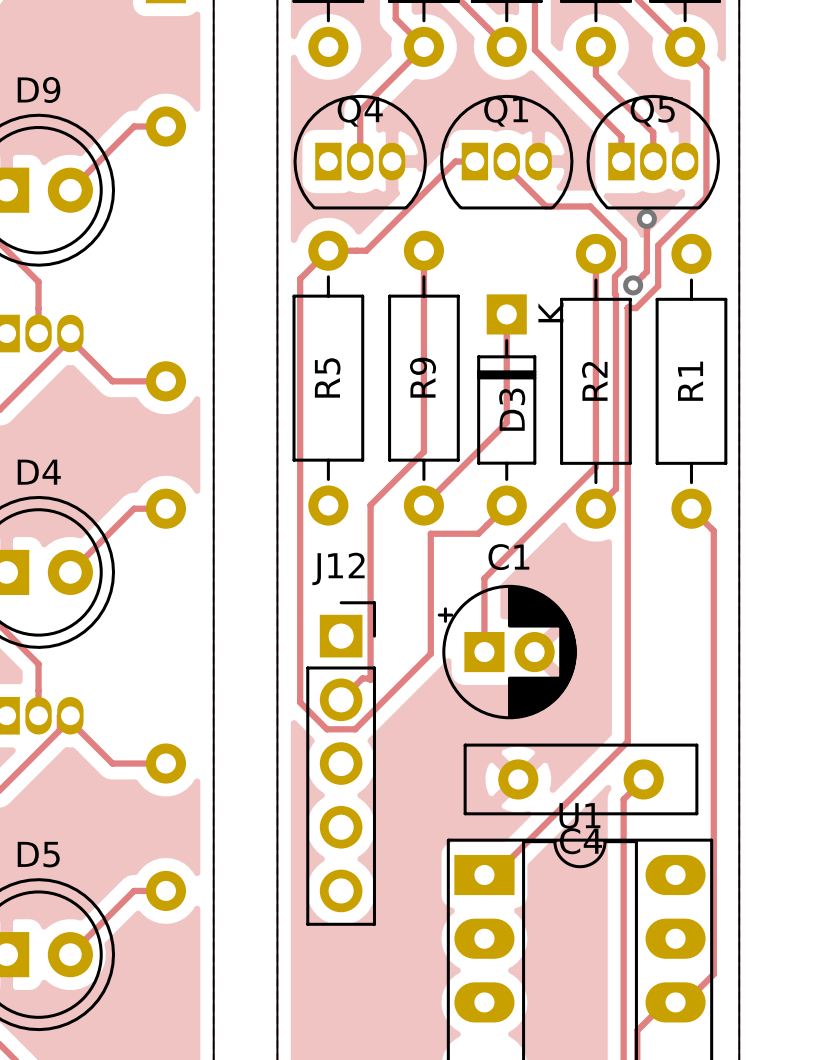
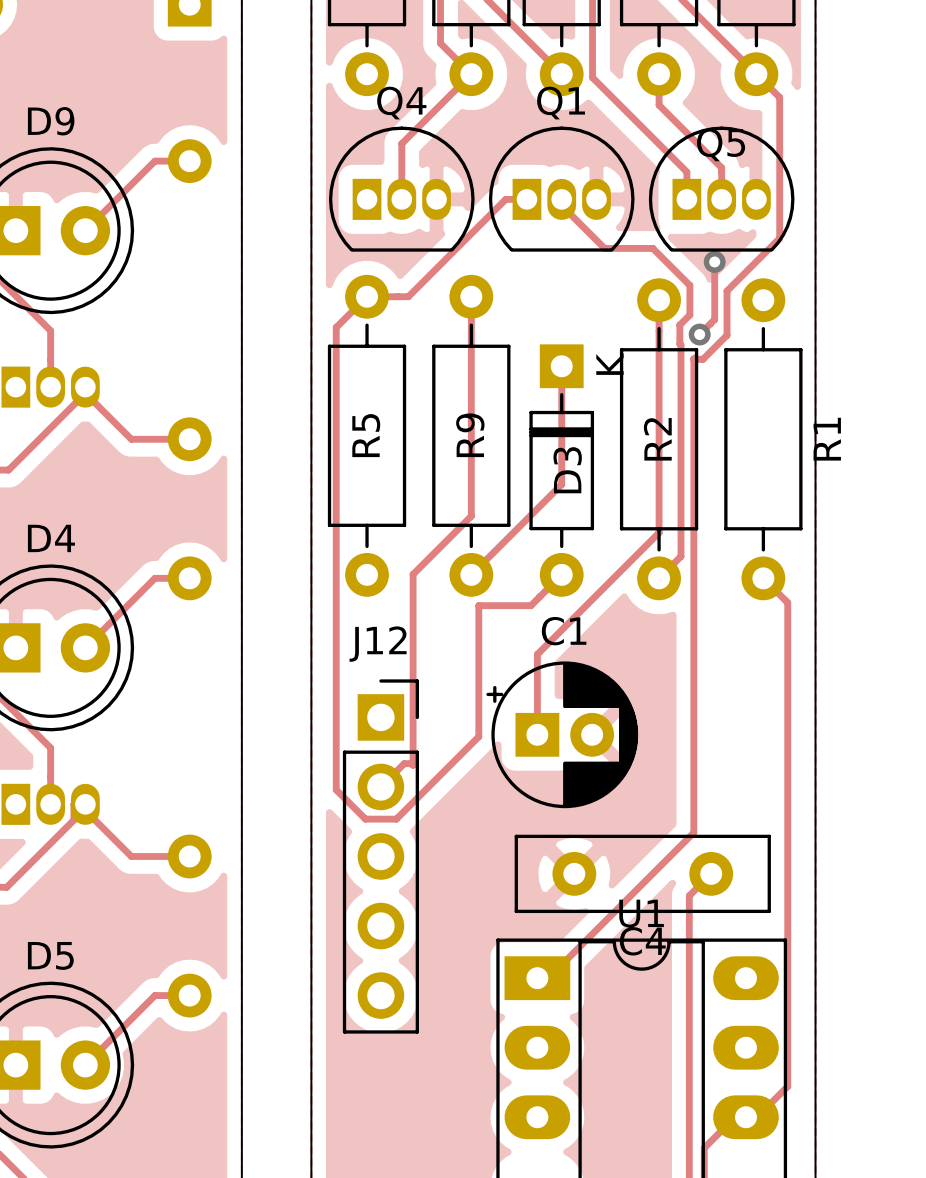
Q4 name position: Q4 (360, 111) -> Q4 (401, 103)
Q1 name position: Q1 (506, 111) -> Q1 (561, 103)
R1 name position: R1 (690, 381) -> R1 (827, 439)

